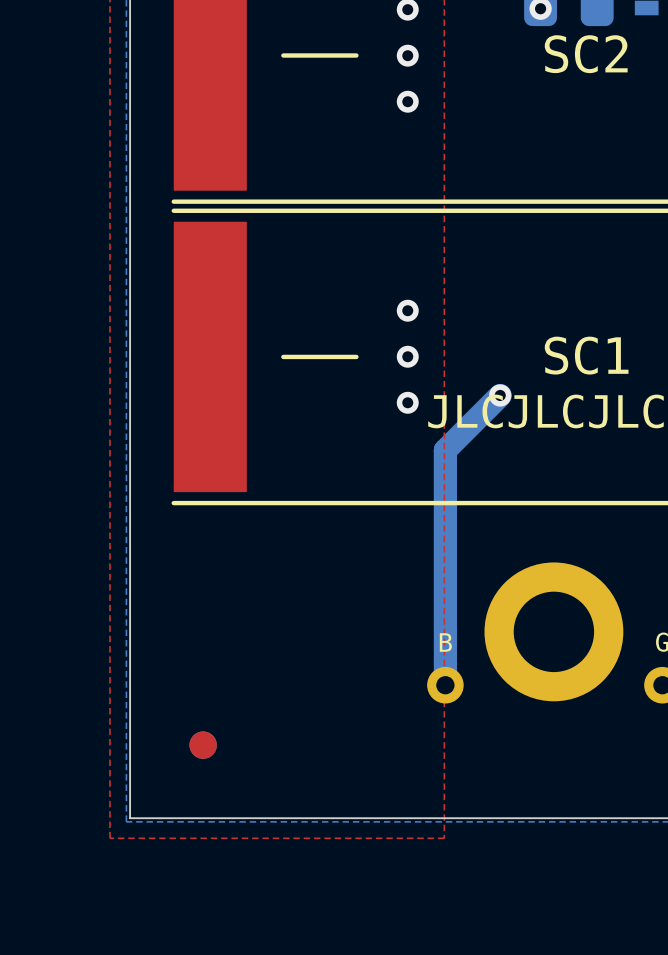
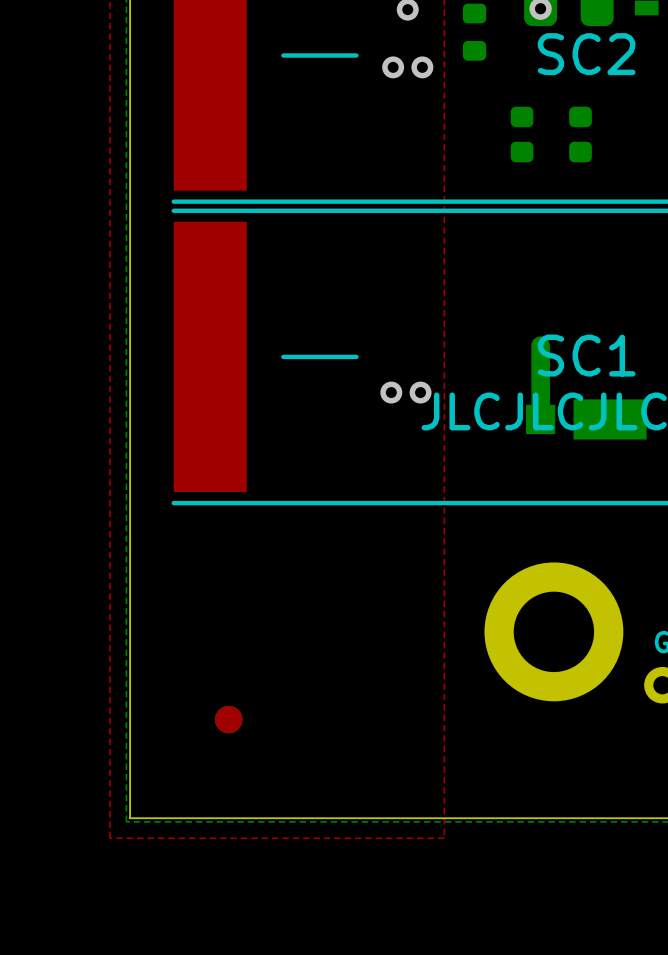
part: none -> (474, 32)
via: (407, 55) -> none
via: none -> (393, 67)
via: none -> (422, 67)
via: (407, 101) -> none
part: none -> (522, 134)
part: none -> (580, 134)
via: (407, 310) -> none
bottom track: none -> (540, 345) (540, 419)
via: (407, 356) -> none
via: none -> (391, 392)
via: none -> (420, 392)
bottom track: (500, 395) (445, 450) (445, 685) -> none
via: (500, 395) -> none
via: (407, 402) -> none
part: none -> (586, 419)
text: B (445, 642) -> none
part: (445, 685) -> none
part position: (203, 745) -> (228, 719)

